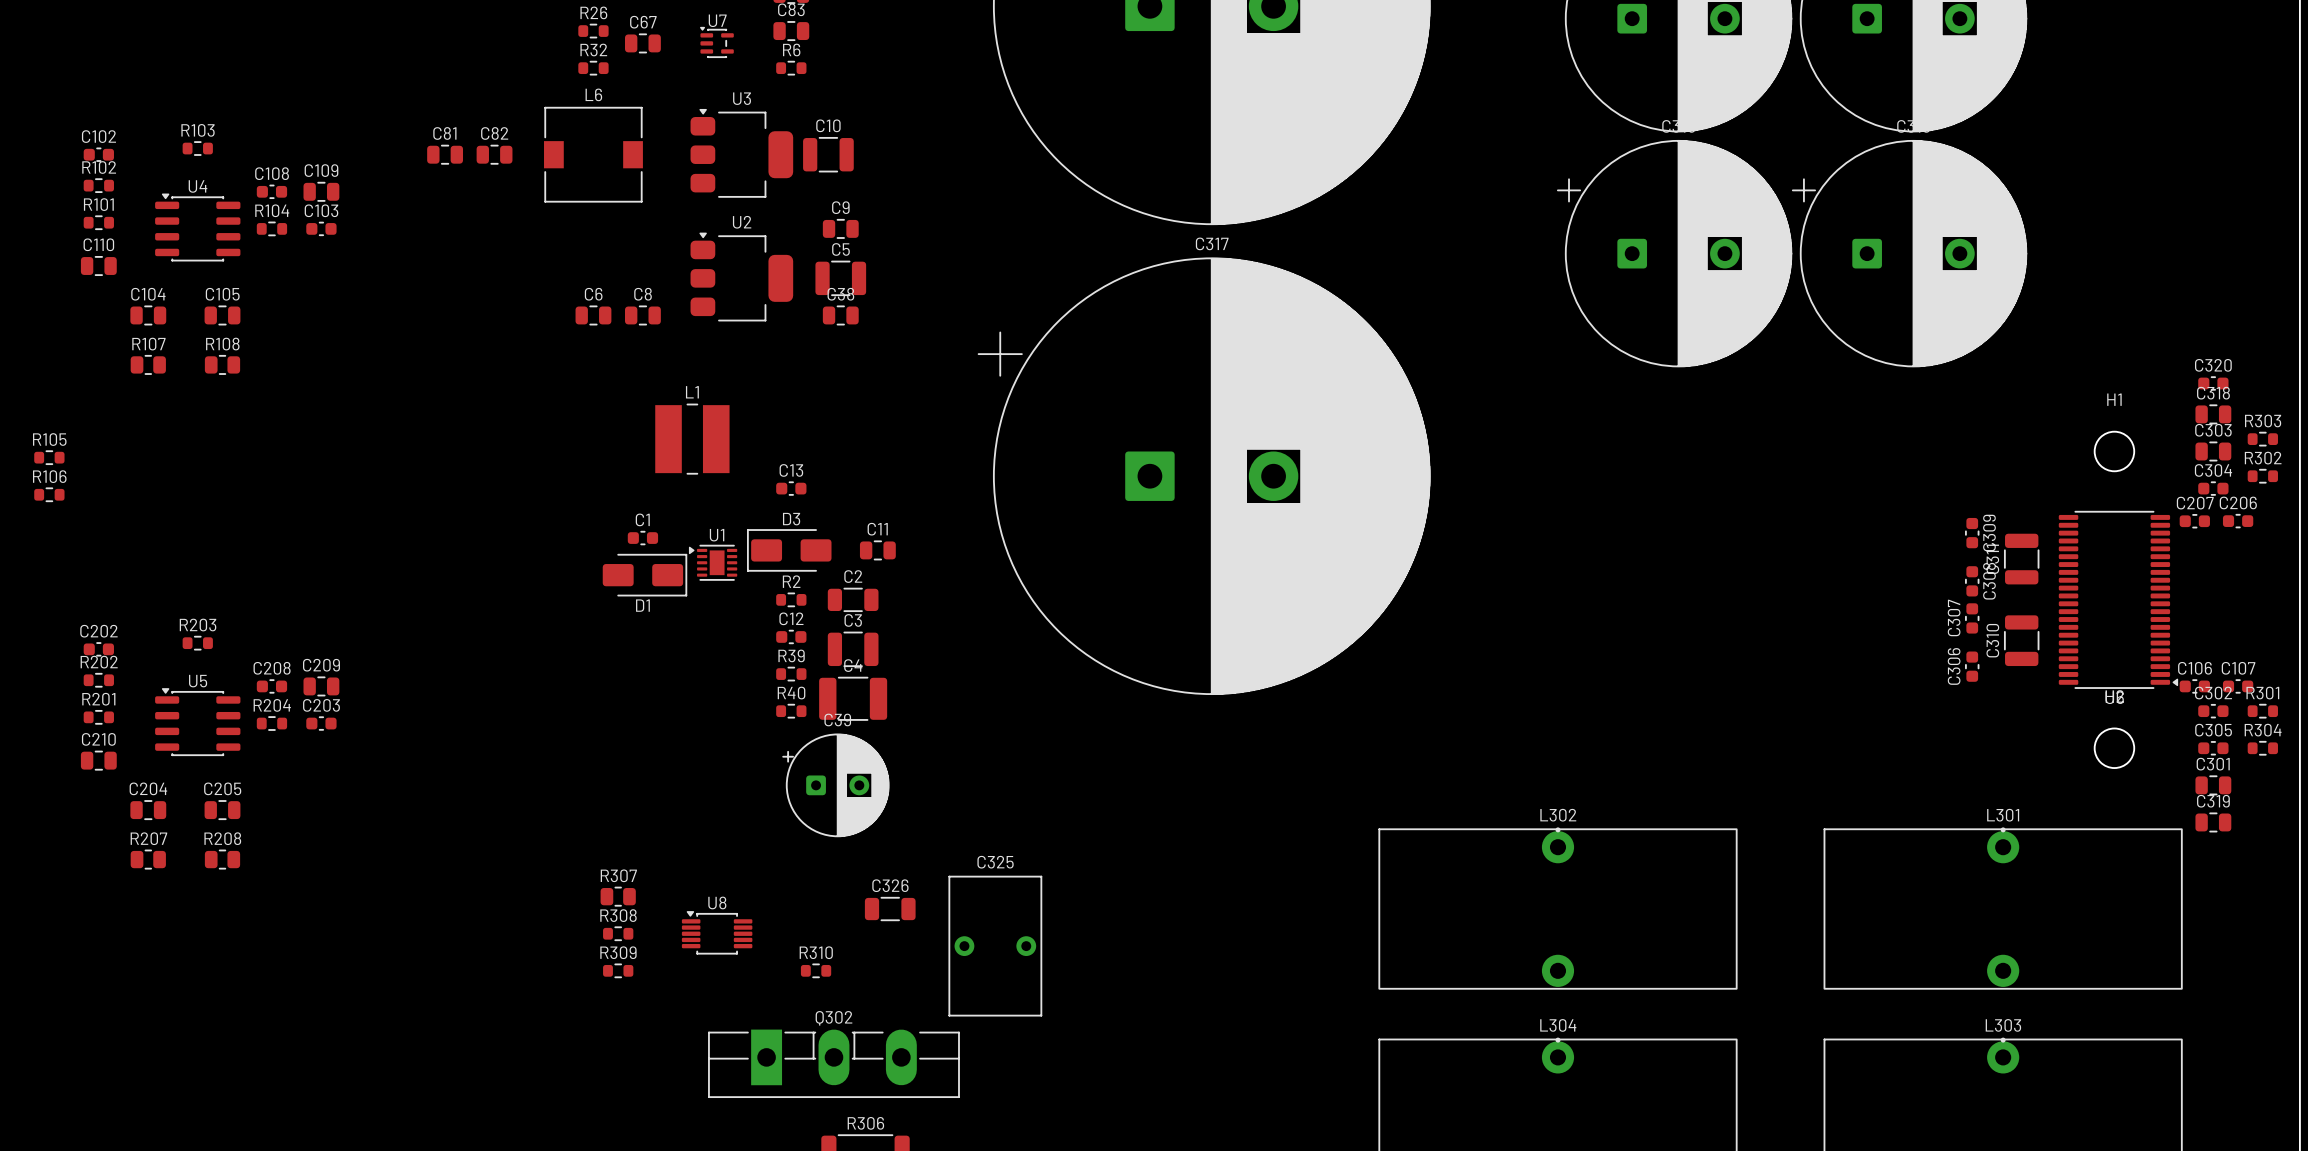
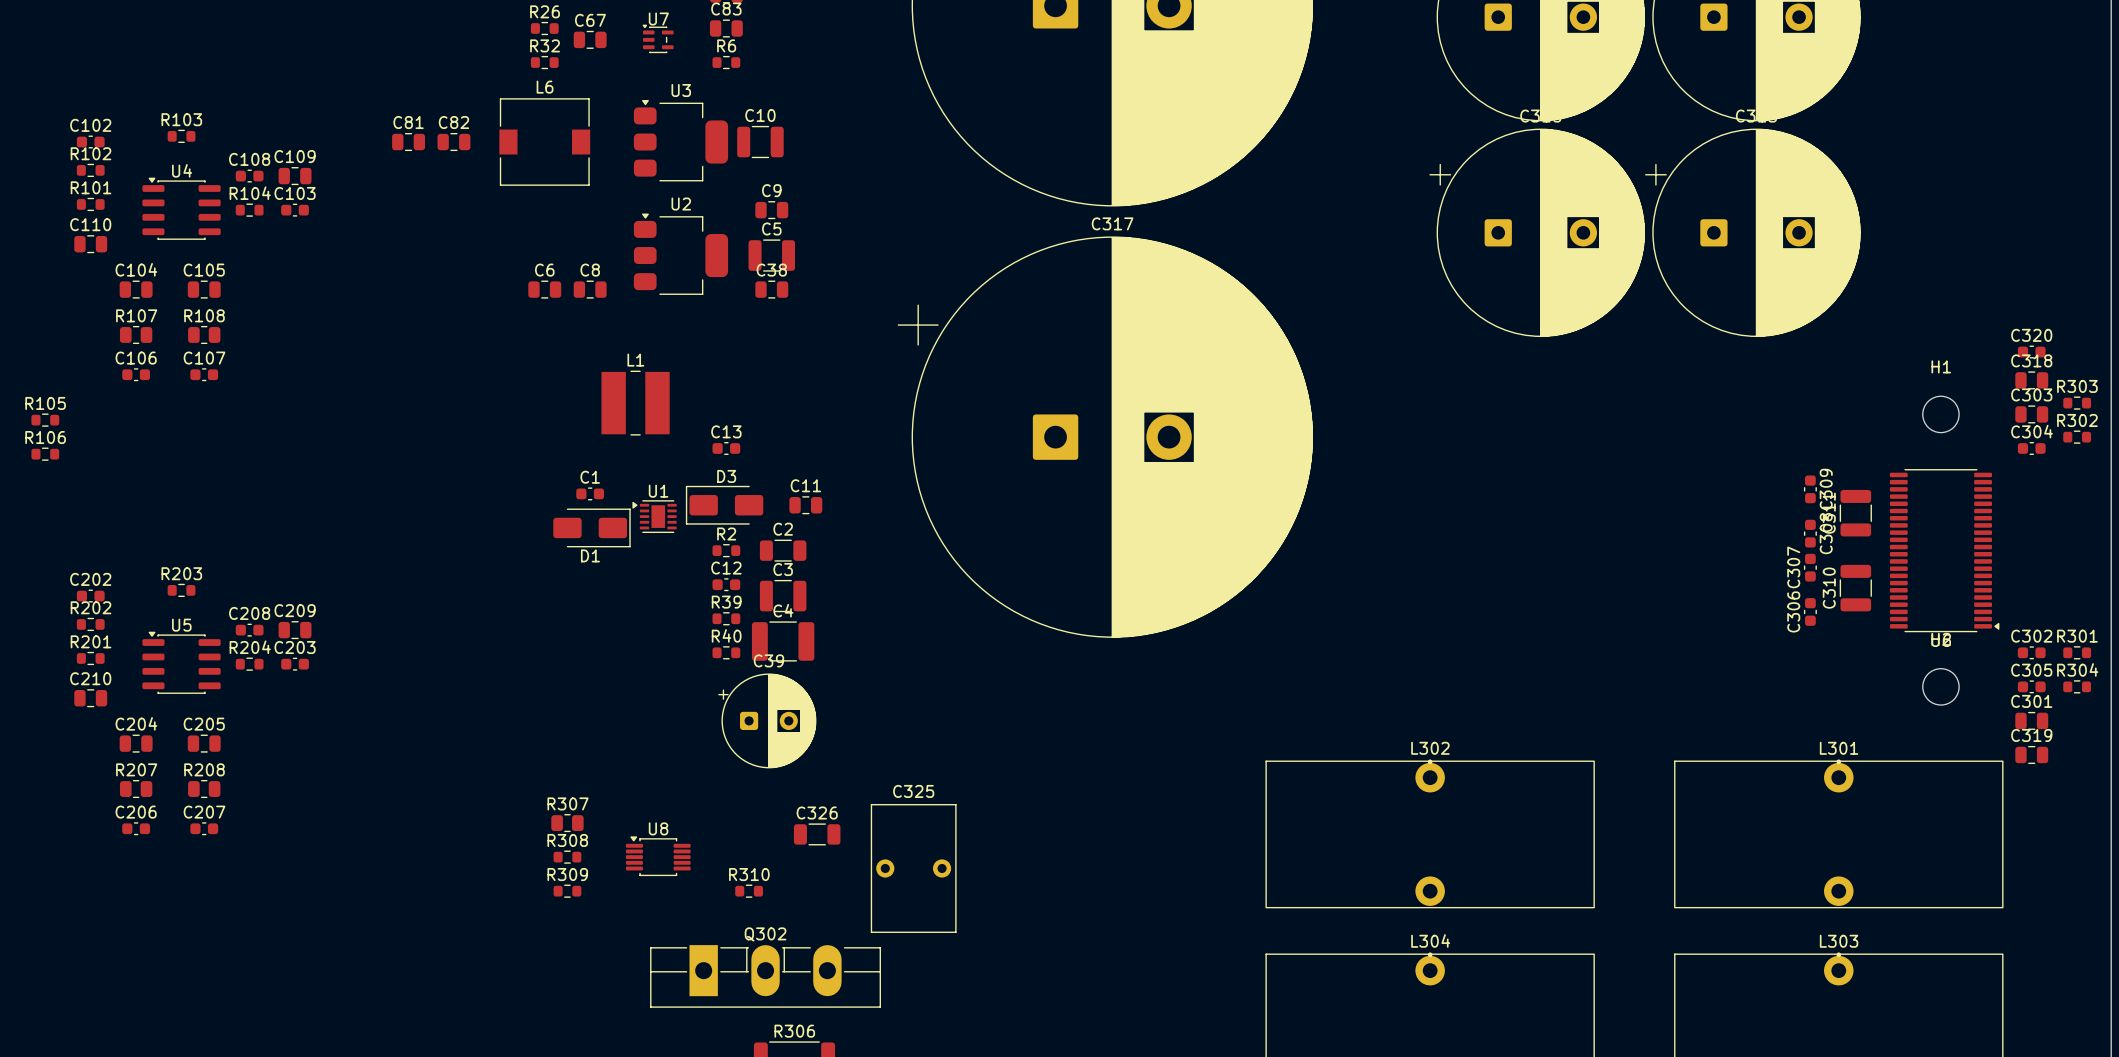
C207 position: (2194, 521) -> (204, 828)
C206 position: (2238, 521) -> (136, 828)
C106 position: (2194, 686) -> (136, 374)
C107 position: (2238, 686) -> (204, 374)

